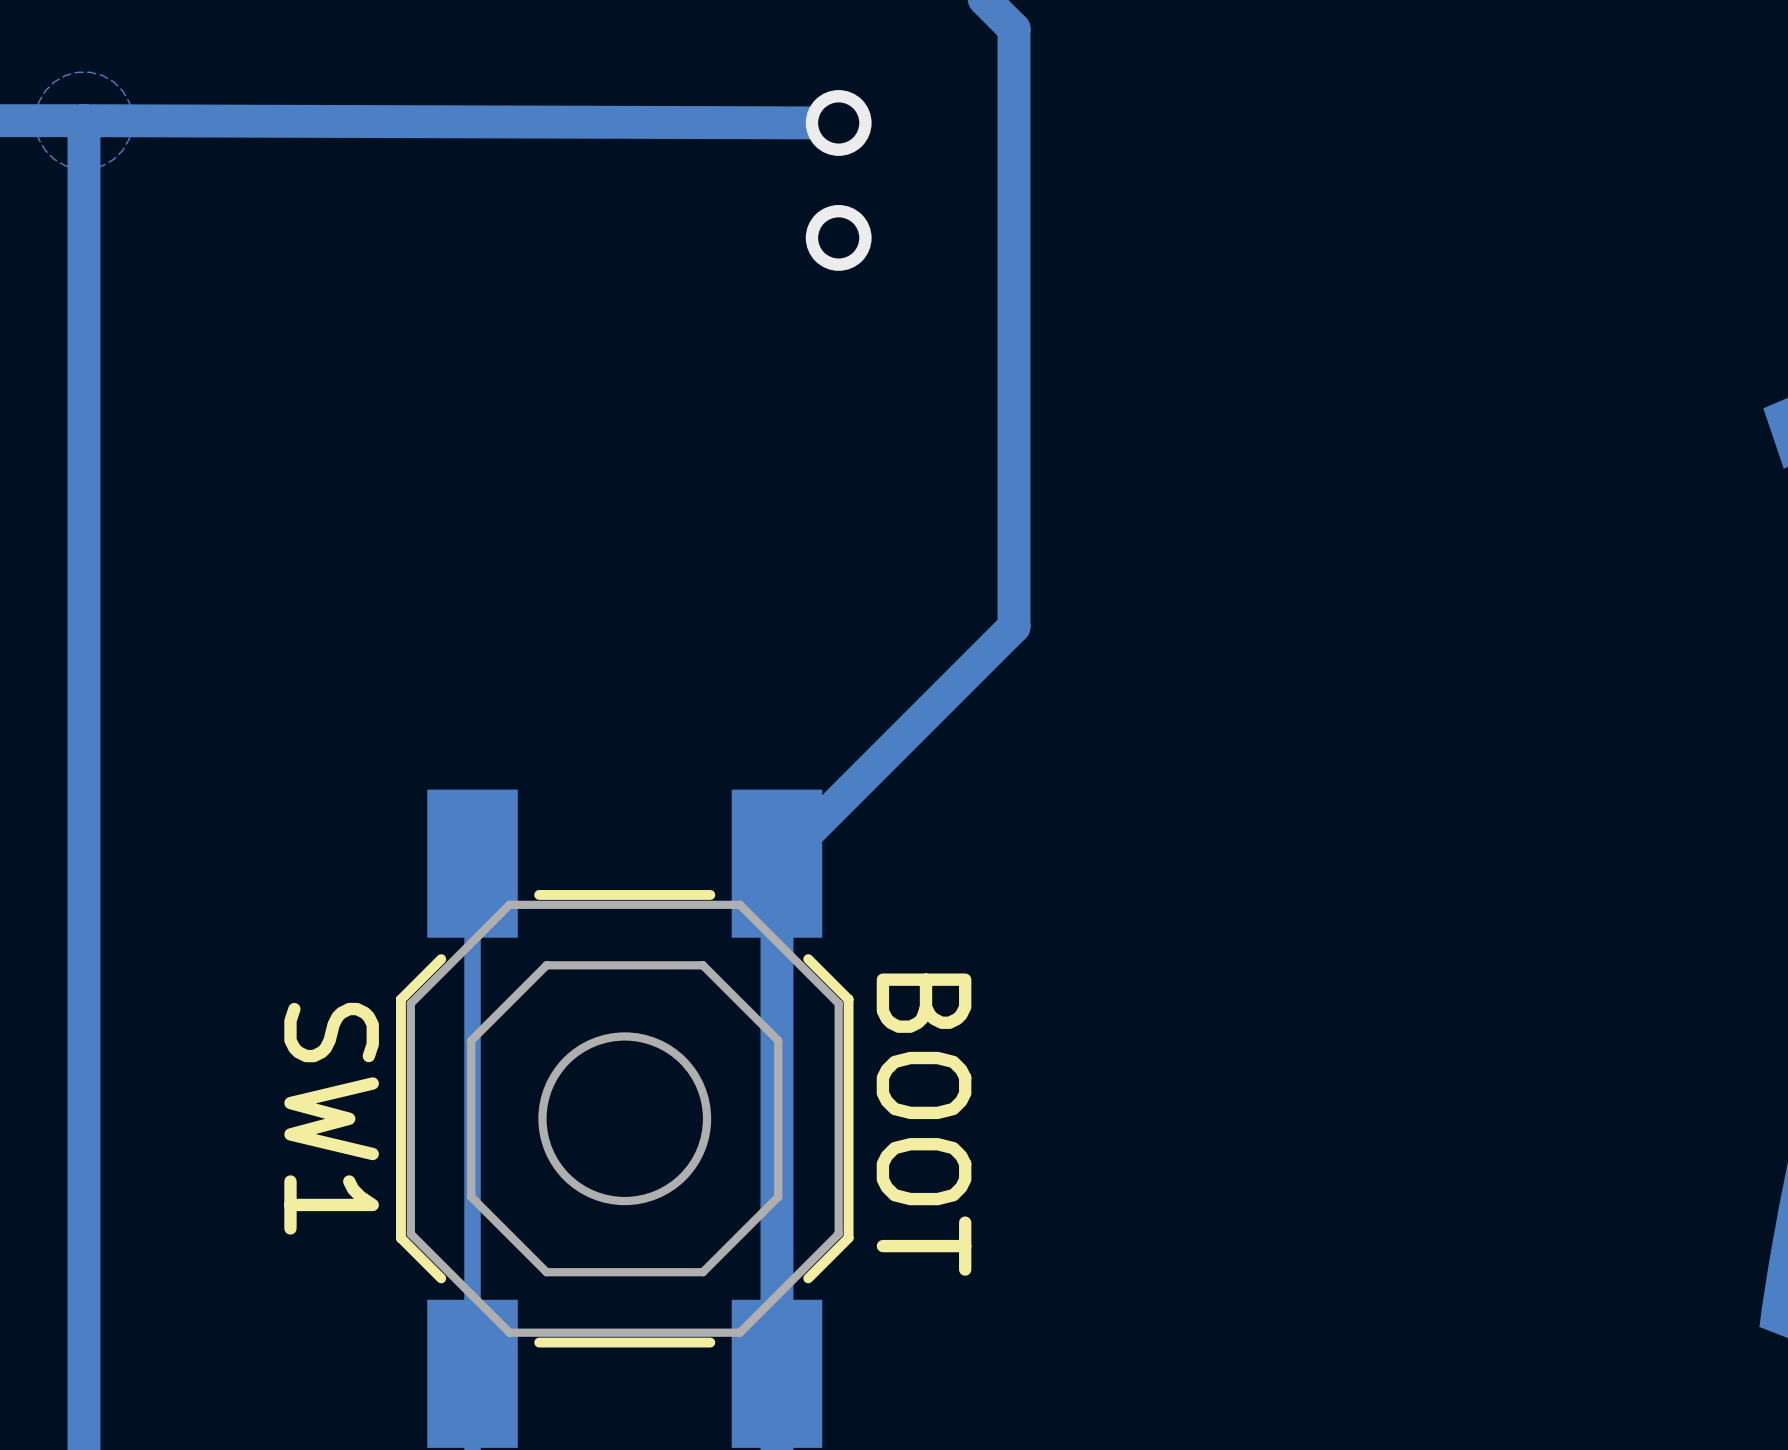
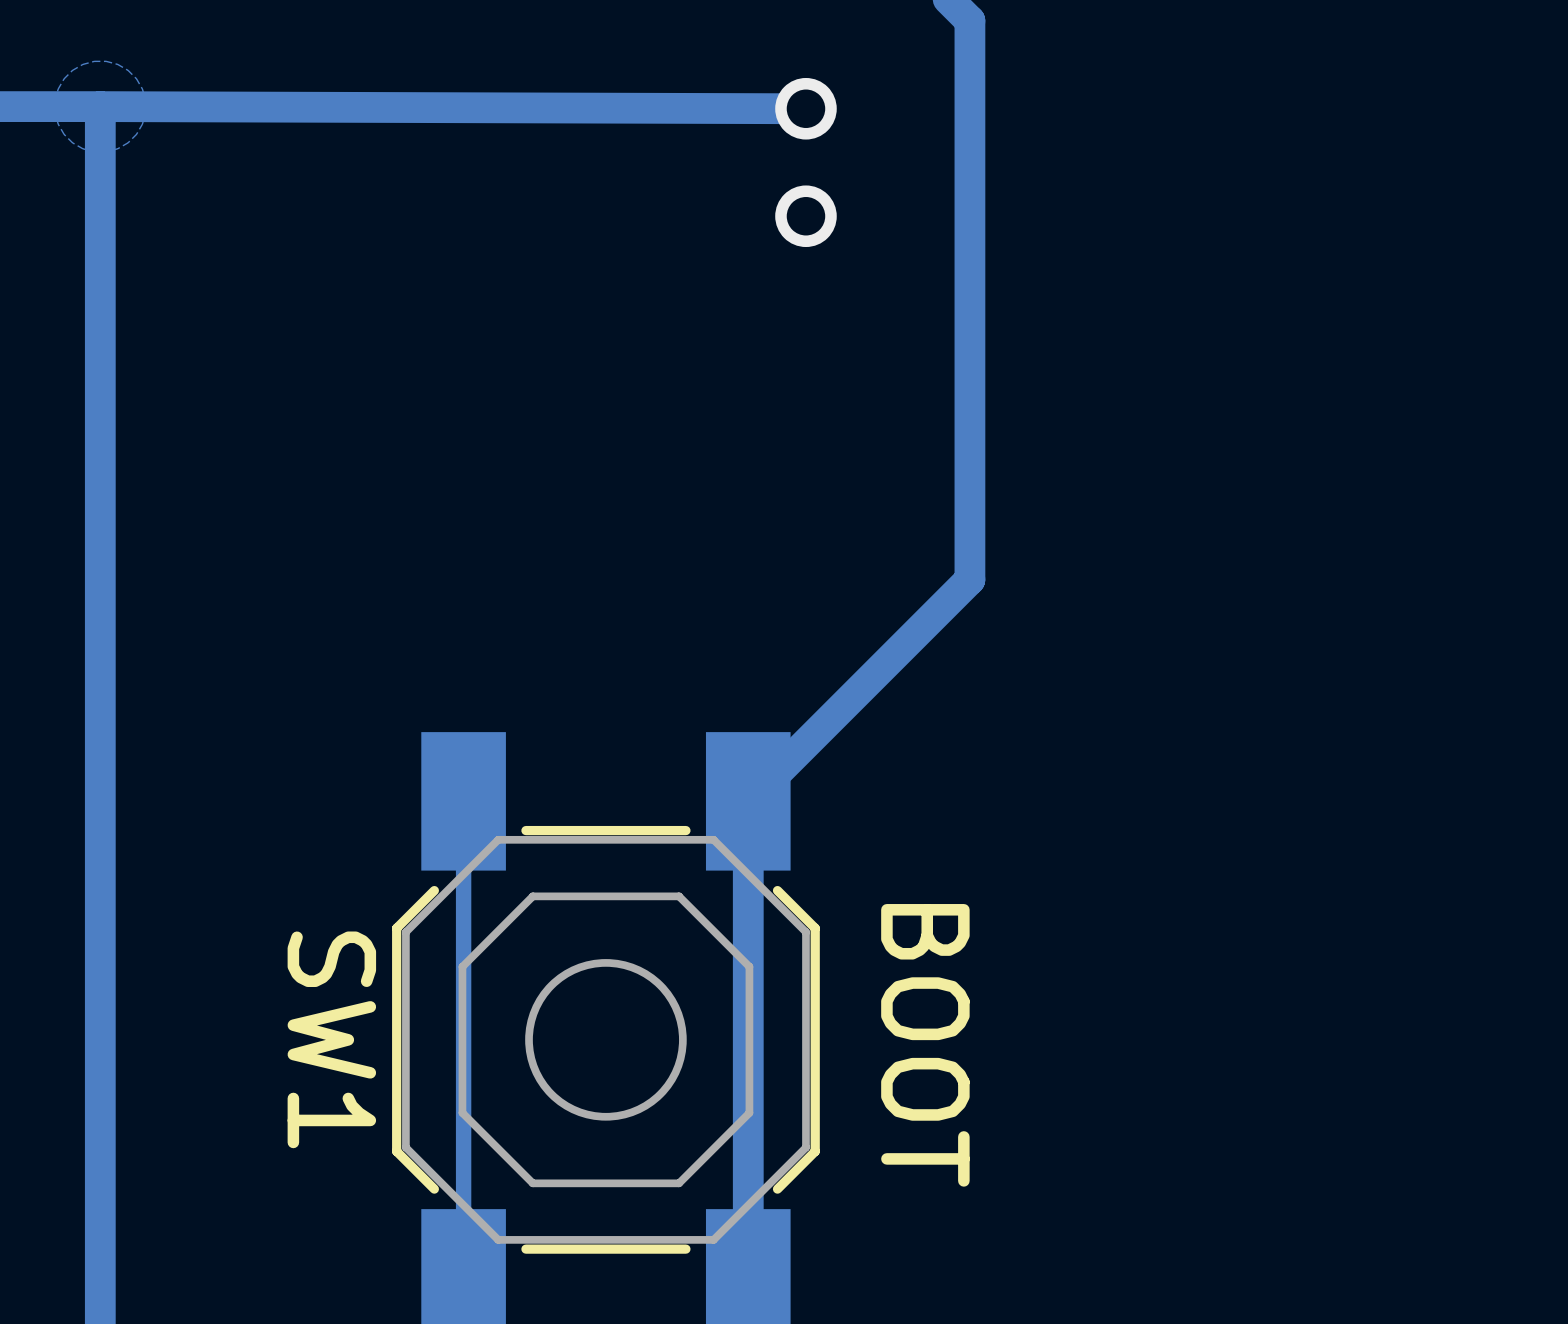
SW1 value position: BOOT (924, 1124) -> BOOT (925, 1045)

